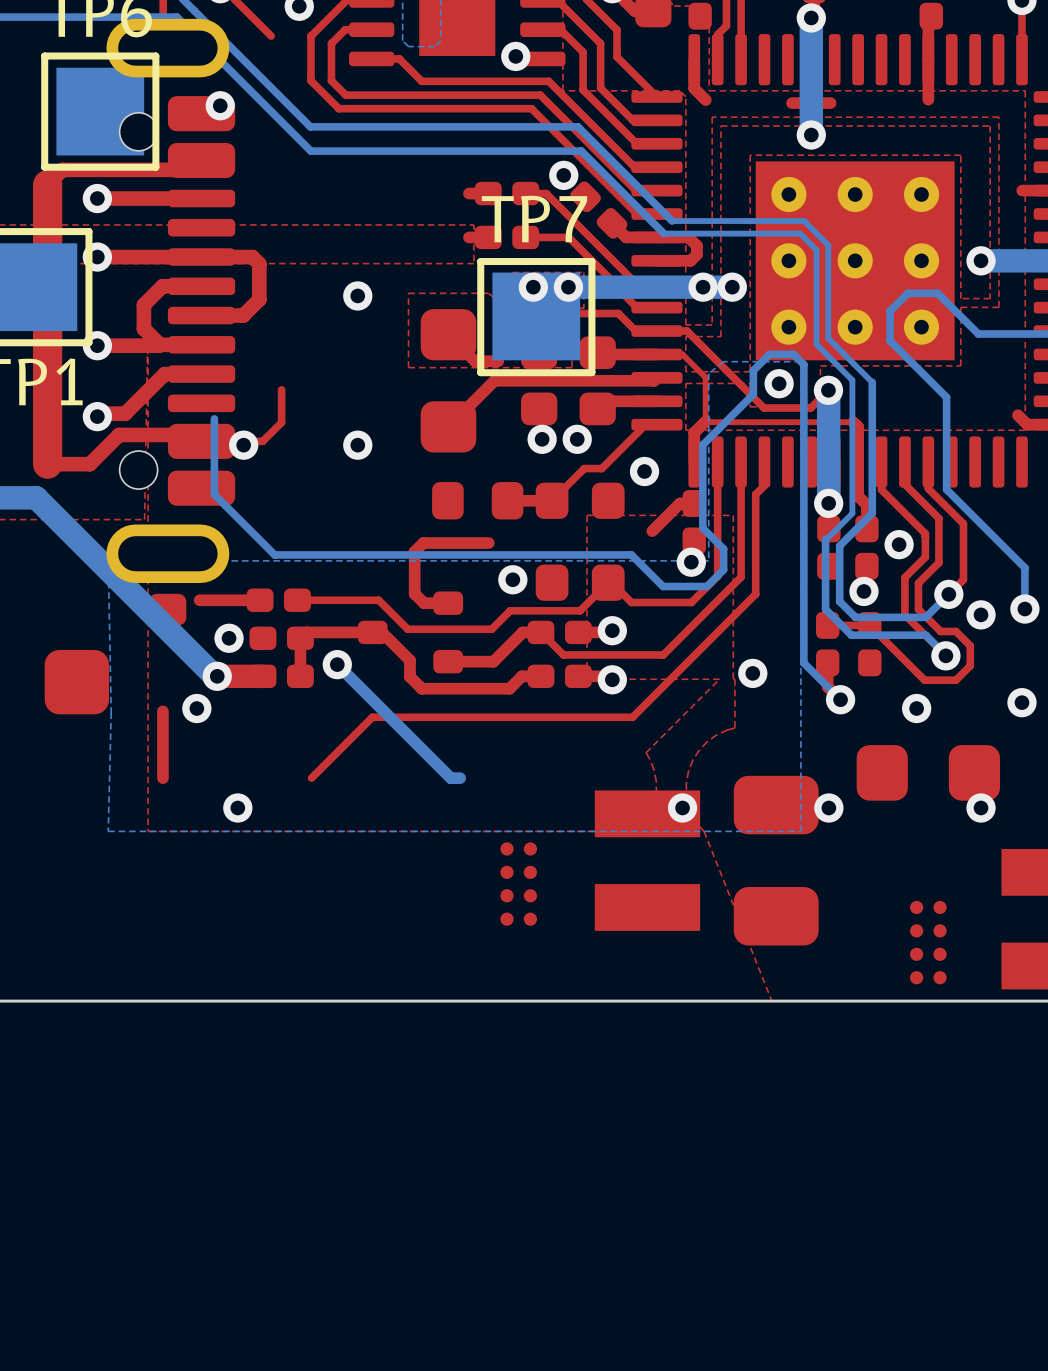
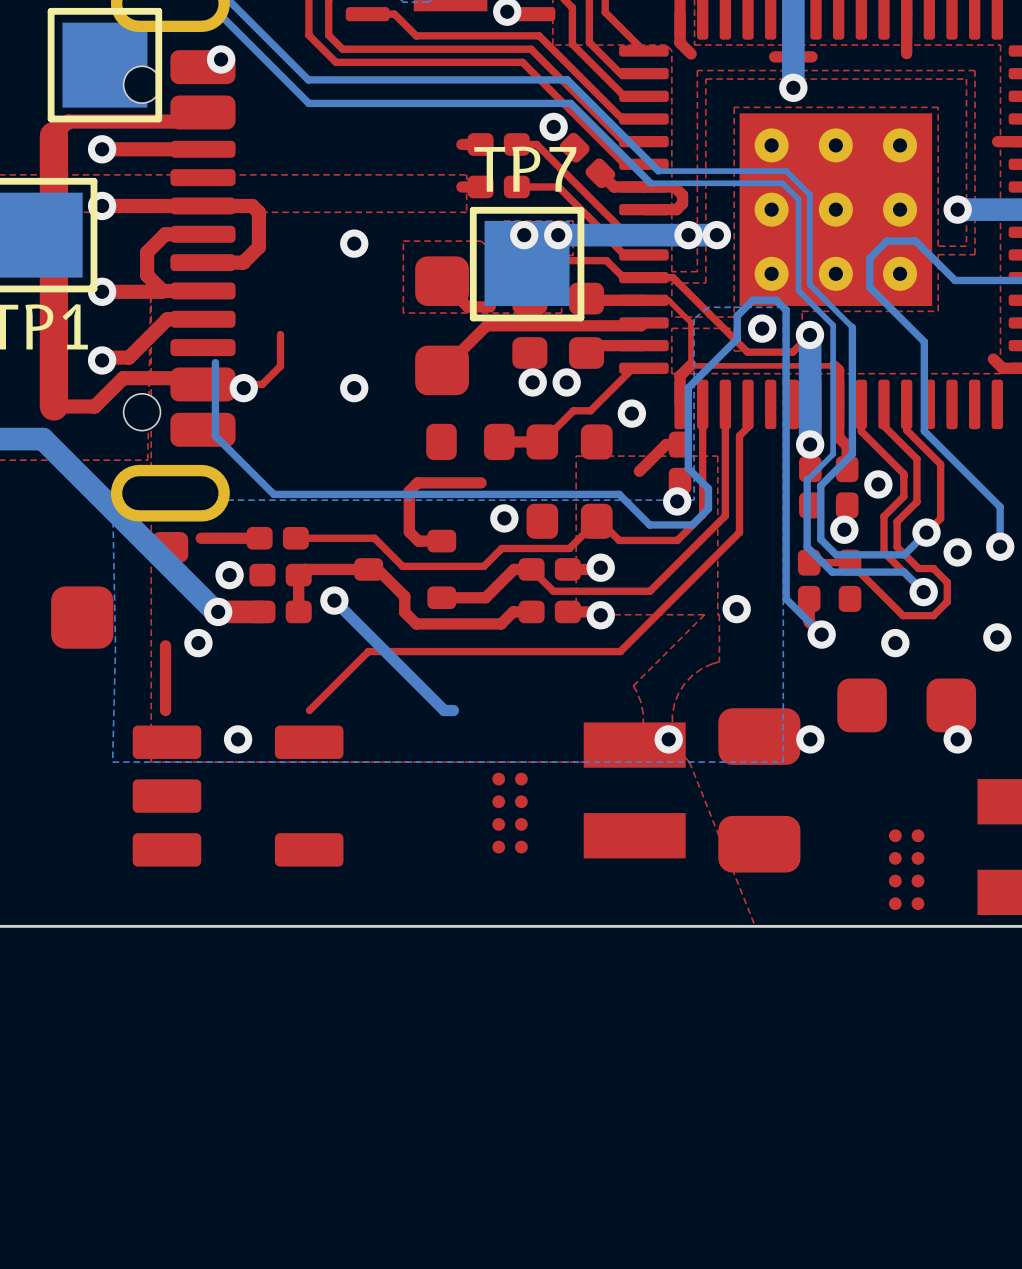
part: none -> (238, 796)

